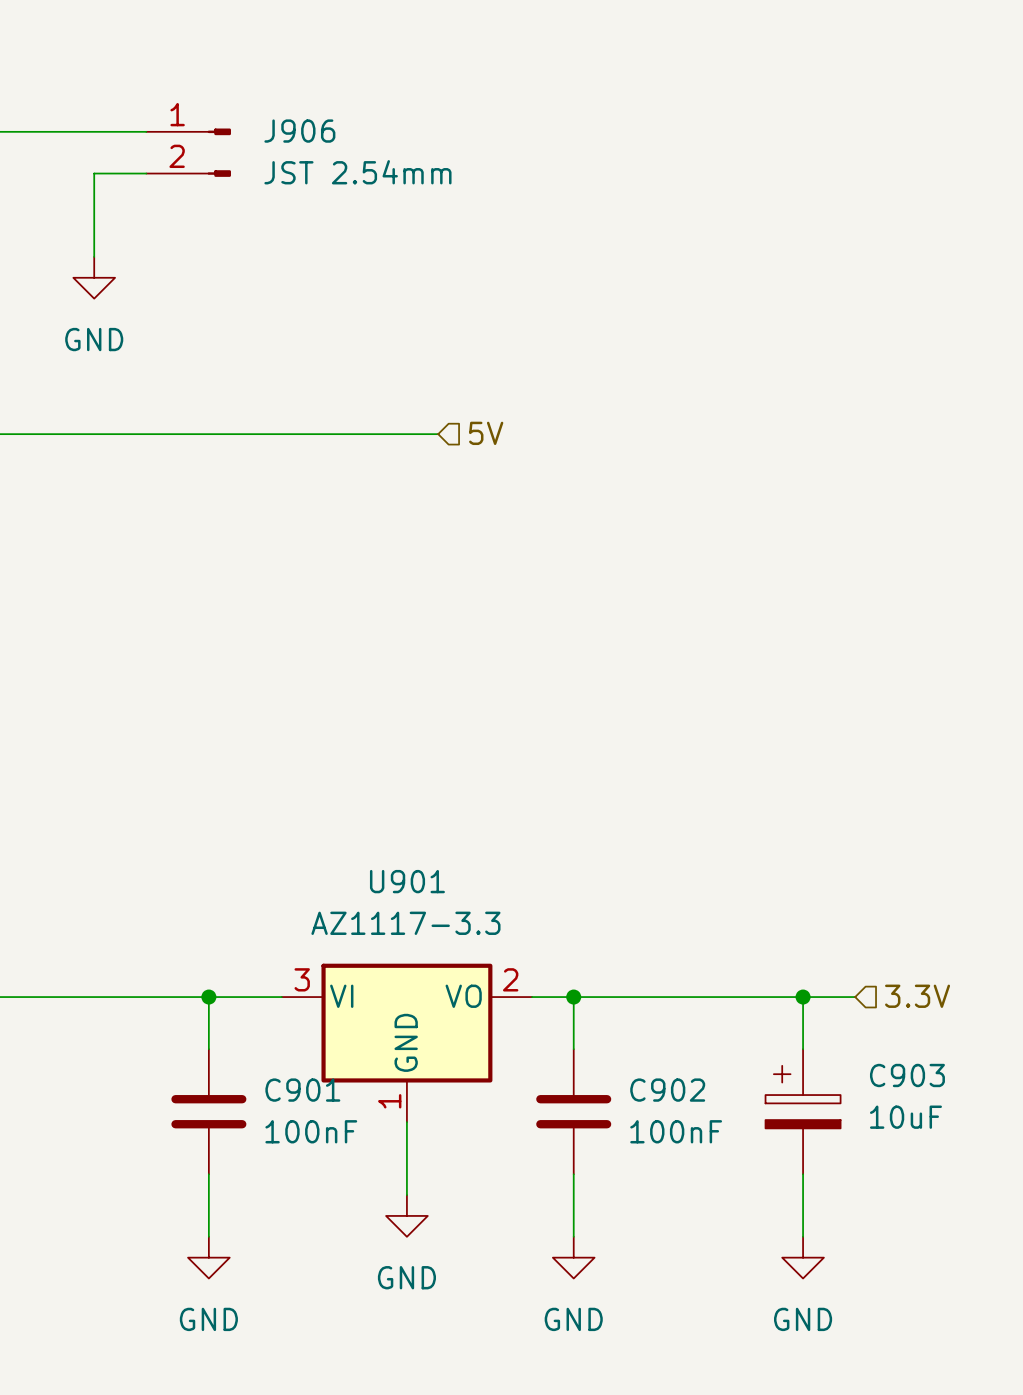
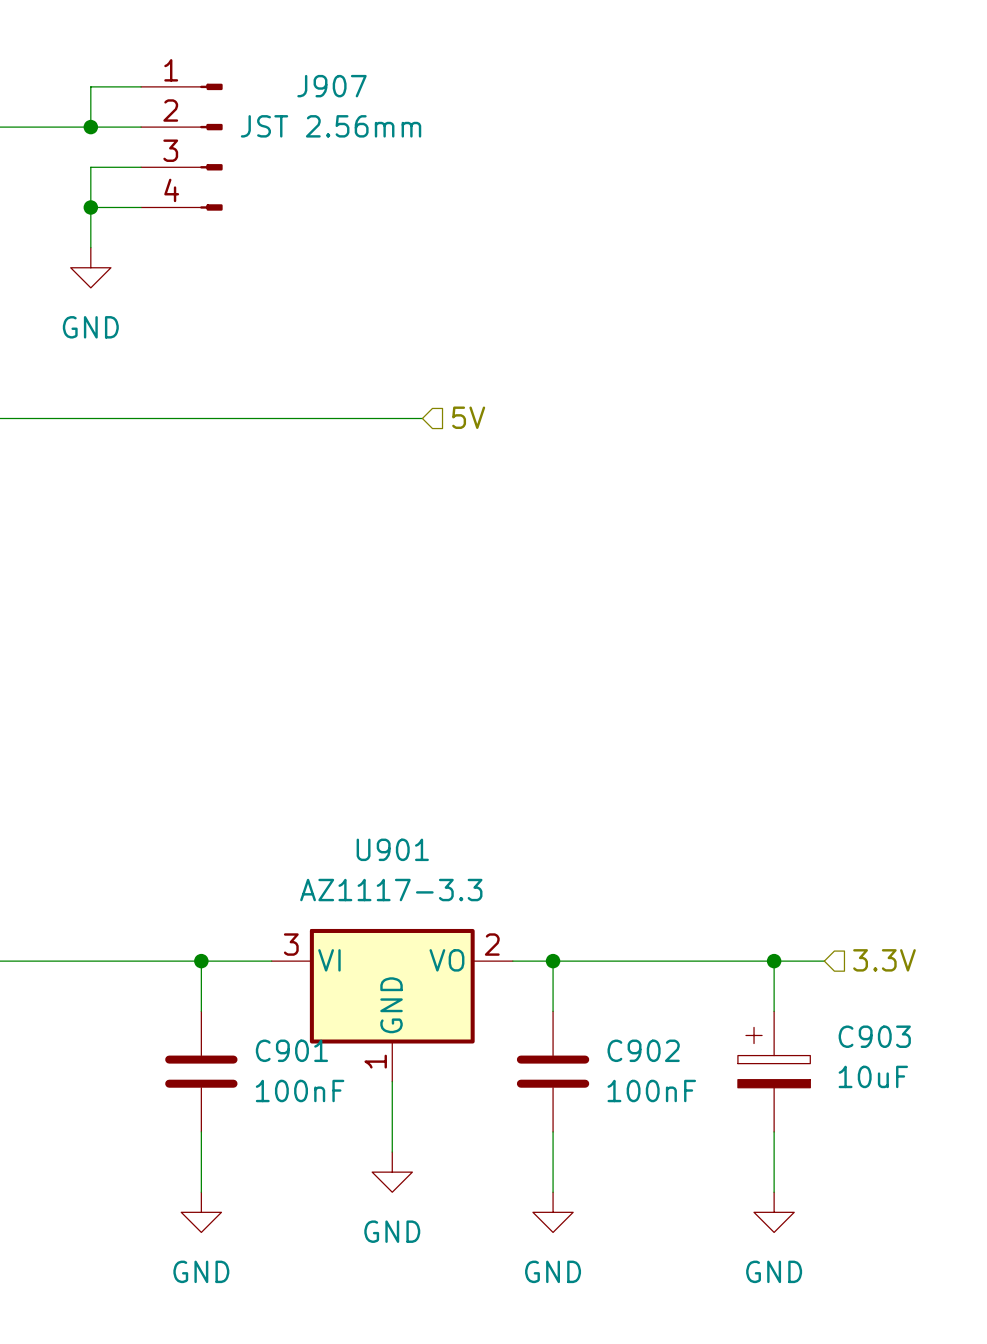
wire: none -> (141, 86) (90, 86) (90, 127)
junction: none -> (90, 127)
J906: JST 2.54mm (188, 152) -> none
J907: none -> JST 2.56mm (181, 147)
wire: none -> (90, 207) (141, 207)
junction: none -> (90, 207)

